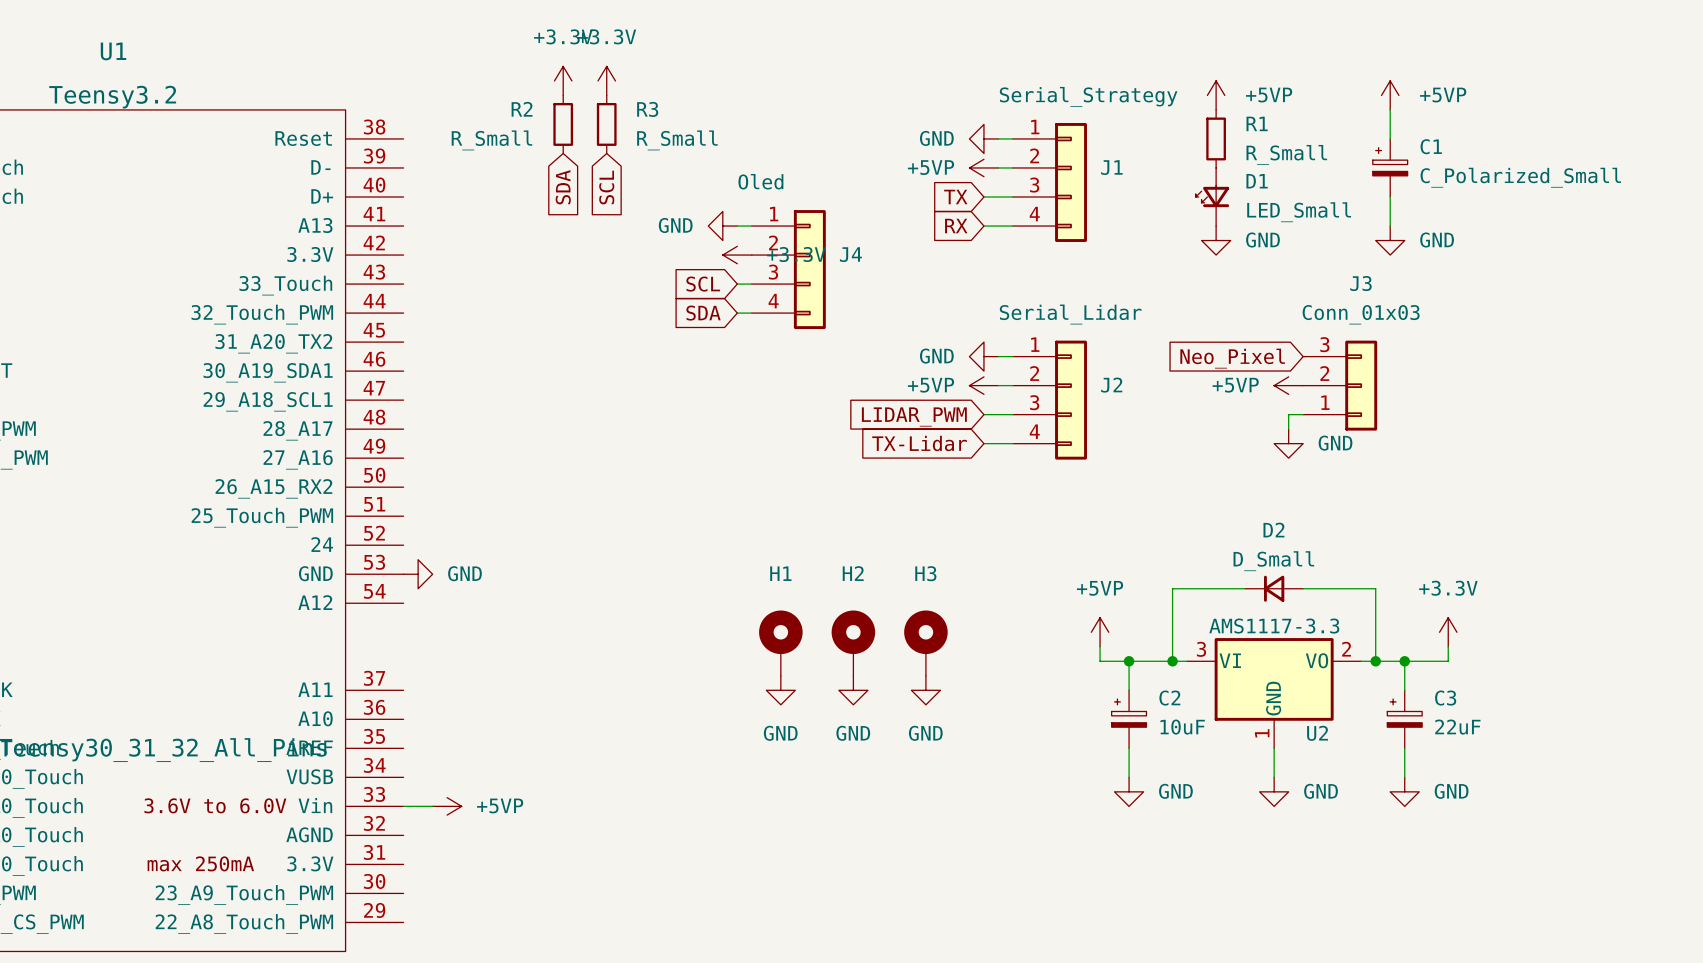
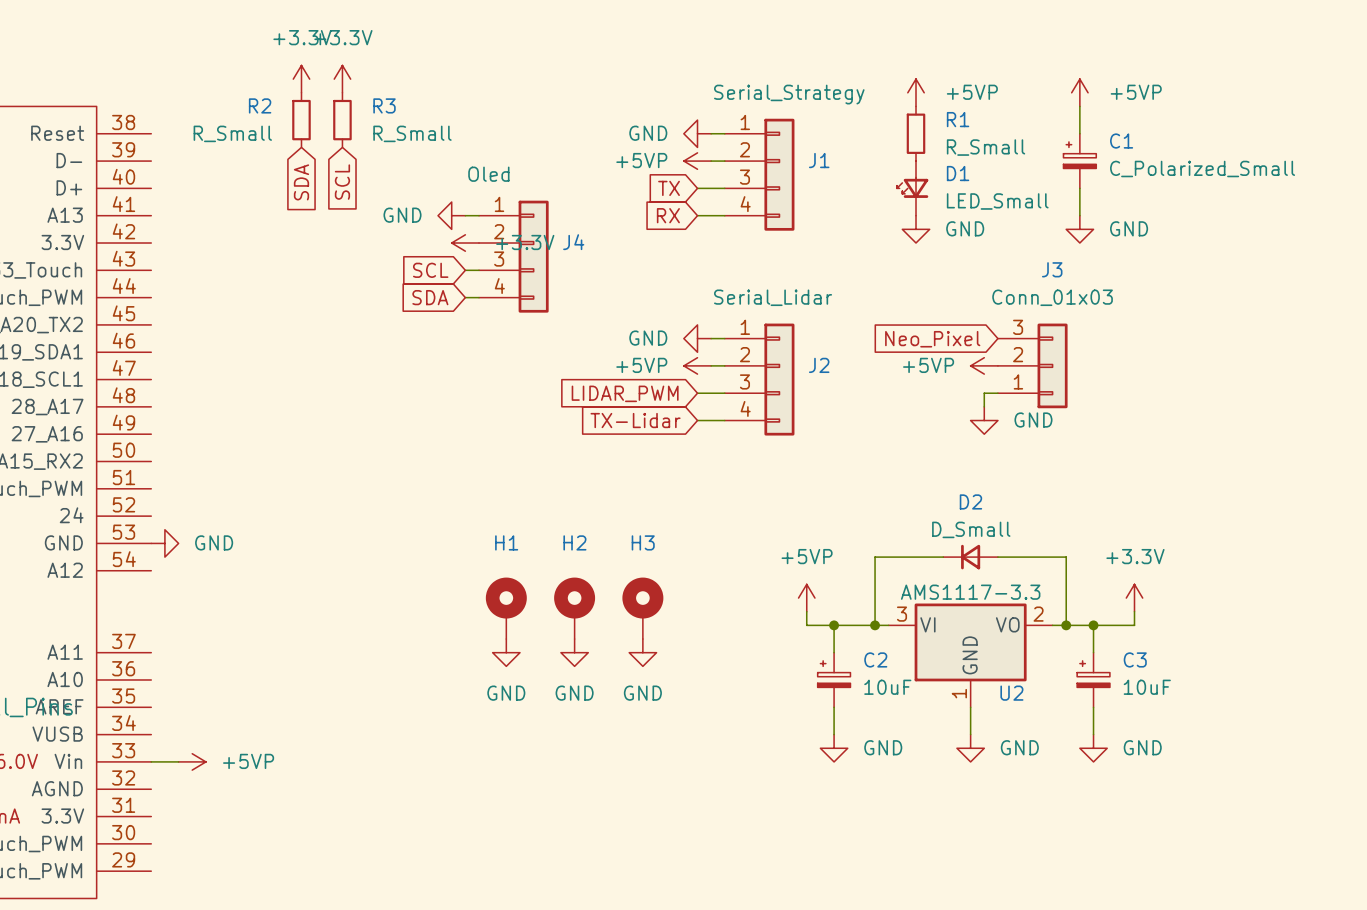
C3 value: 22uF (1457, 727) -> 10uF (1147, 687)

